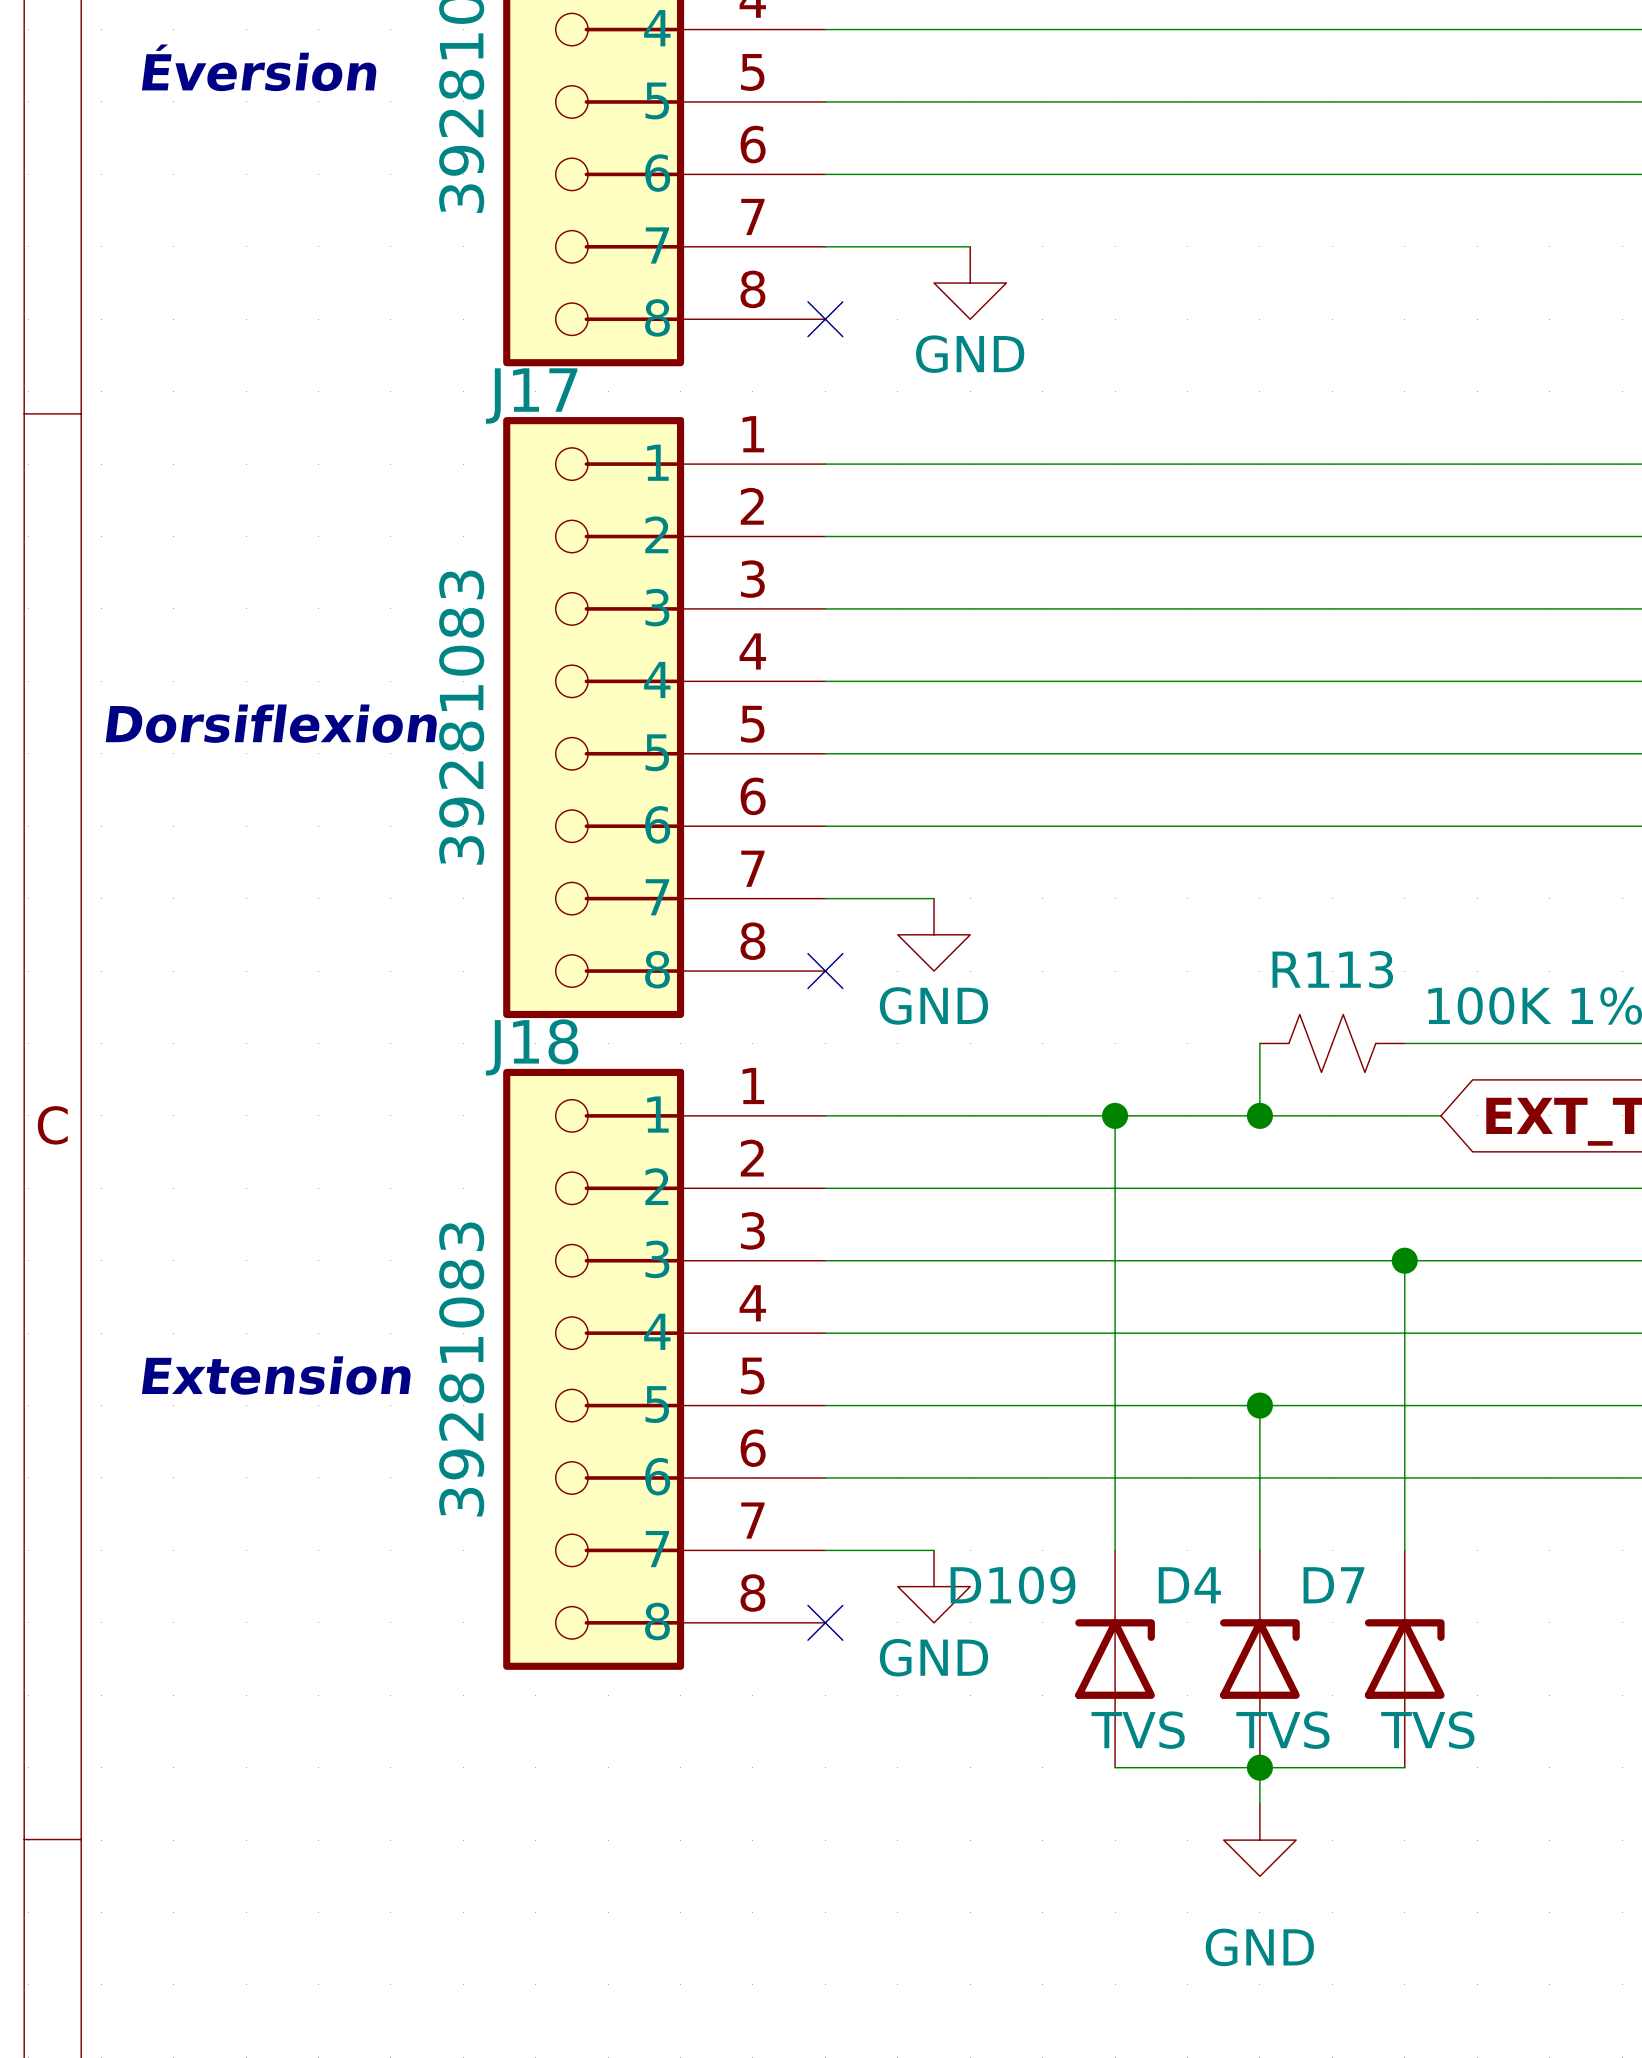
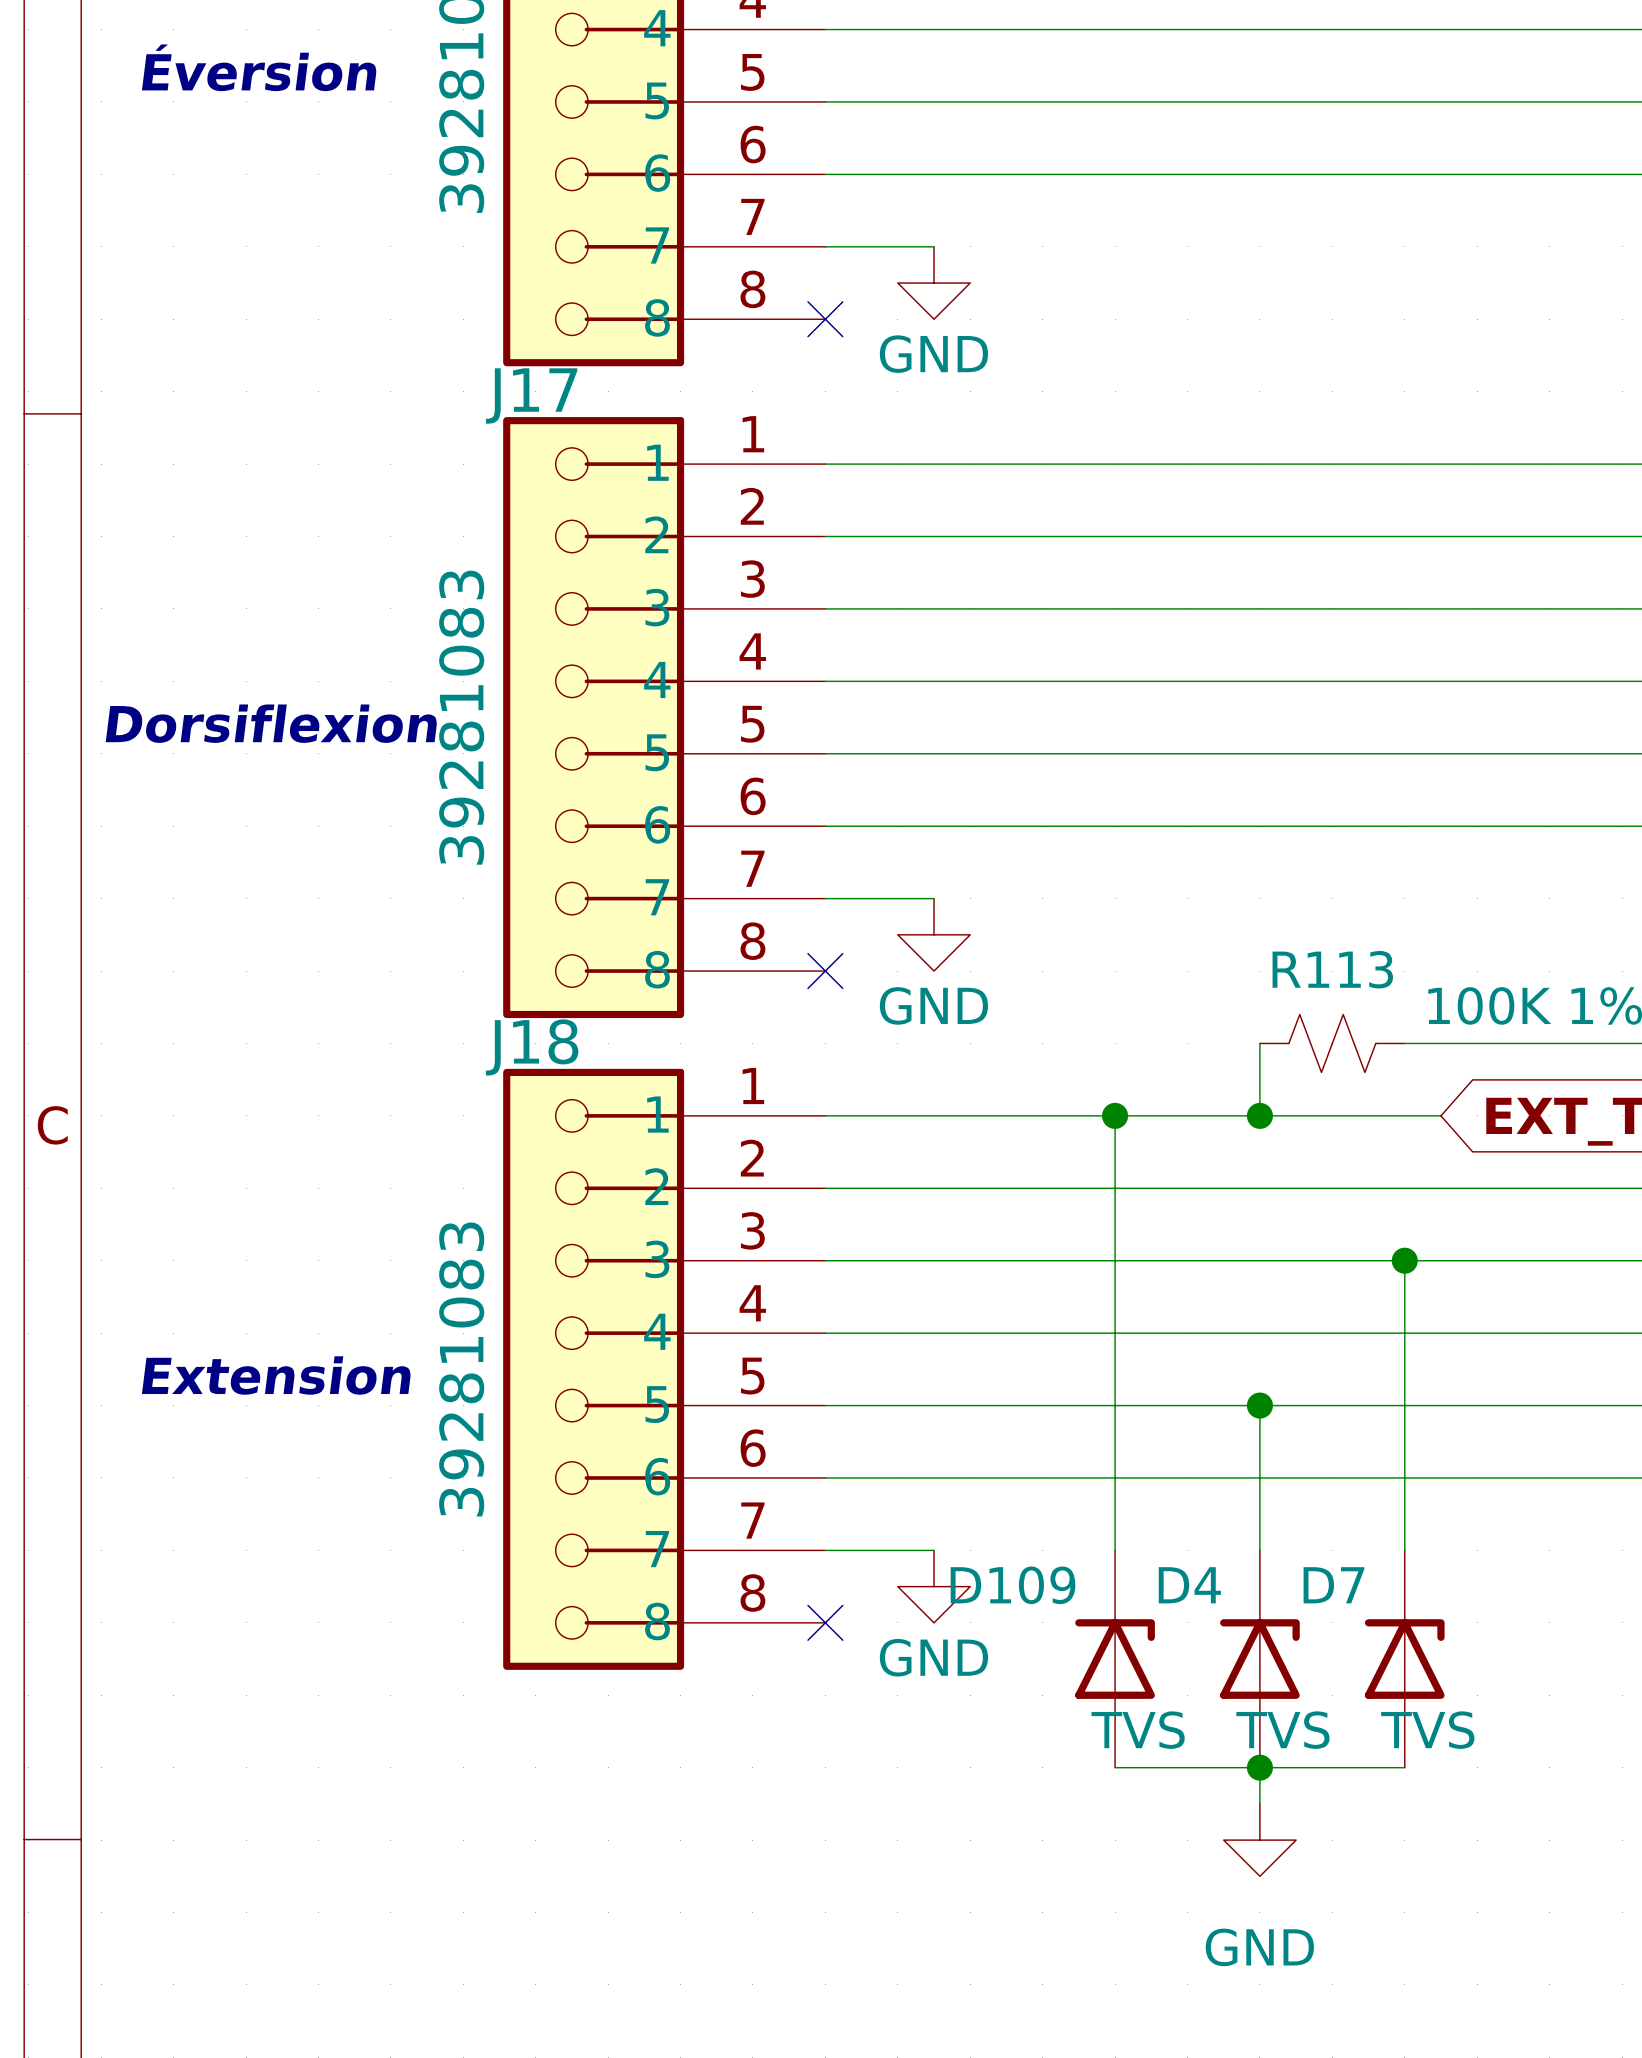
wire: (934, 246) (970, 246) -> none
power symbol position: GND (970, 283) -> GND (934, 283)

